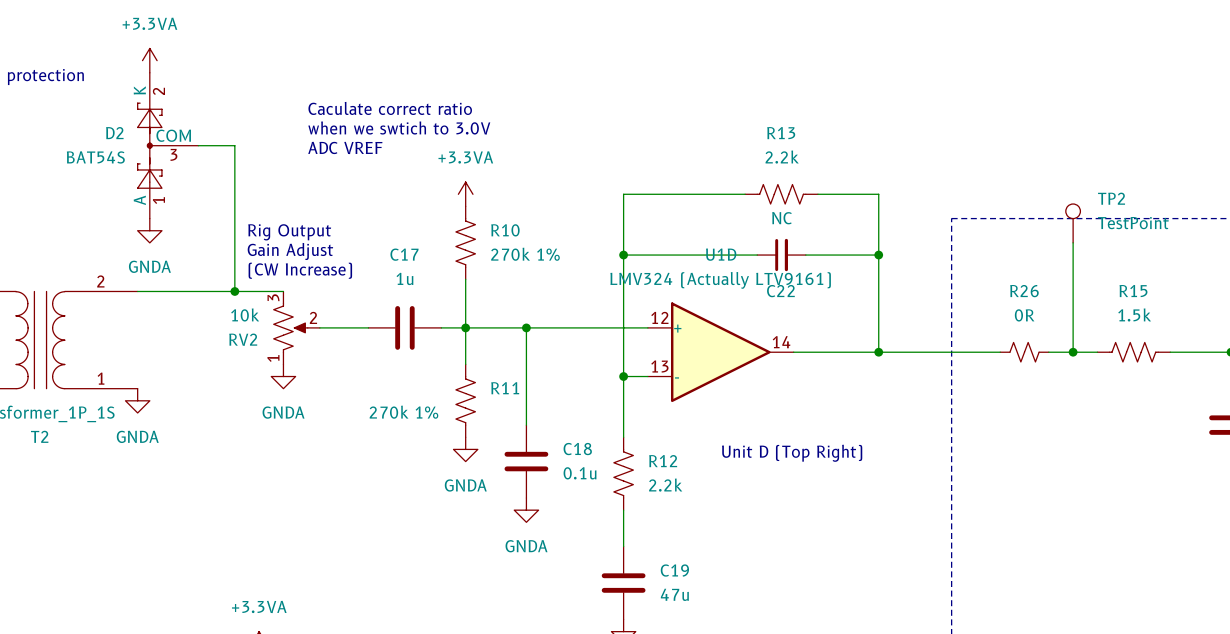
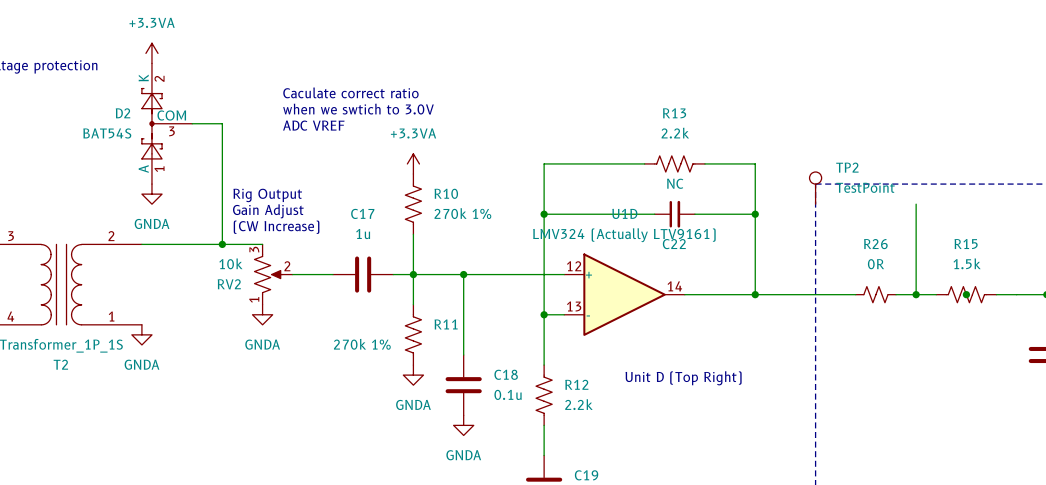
TP2 position: (1073, 223) -> (815, 188)
junction: none -> (966, 294)

